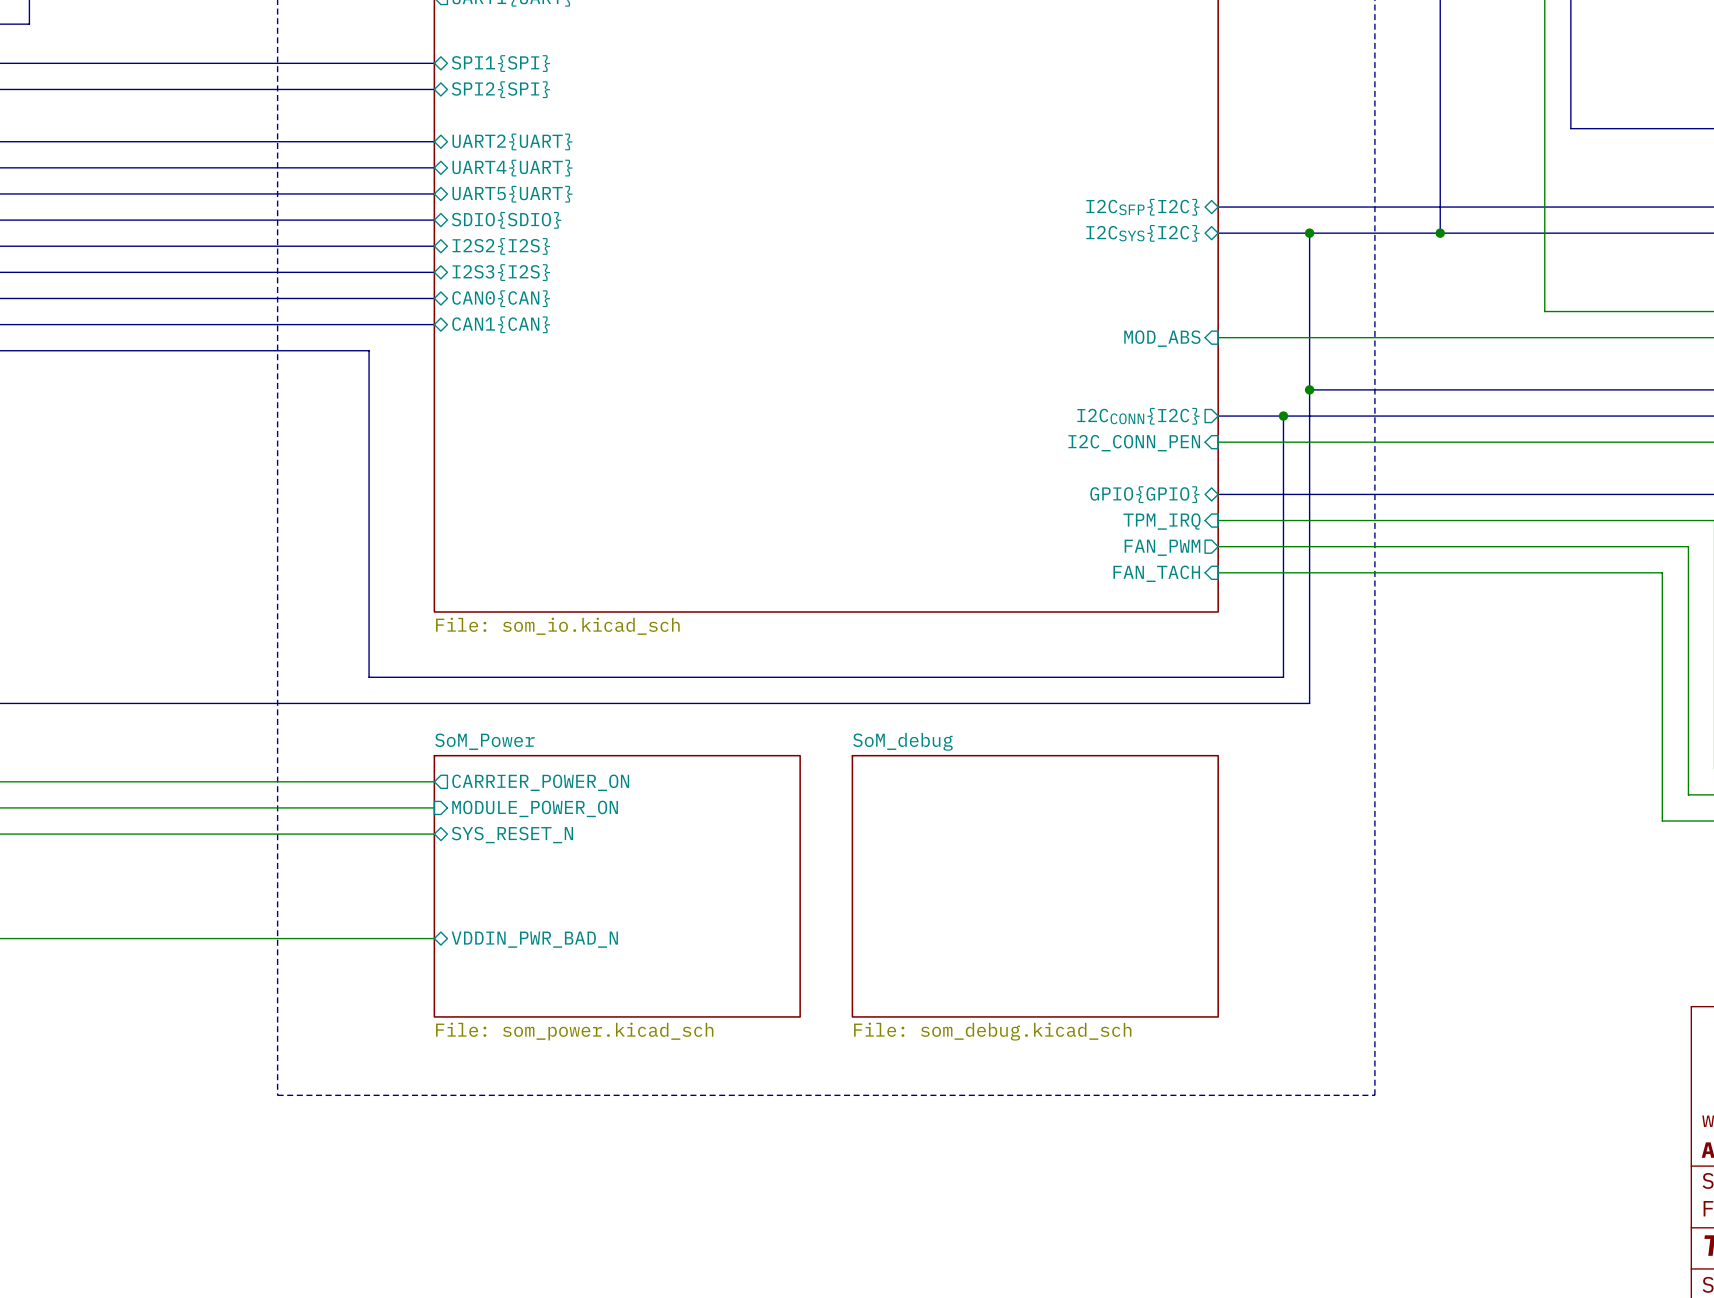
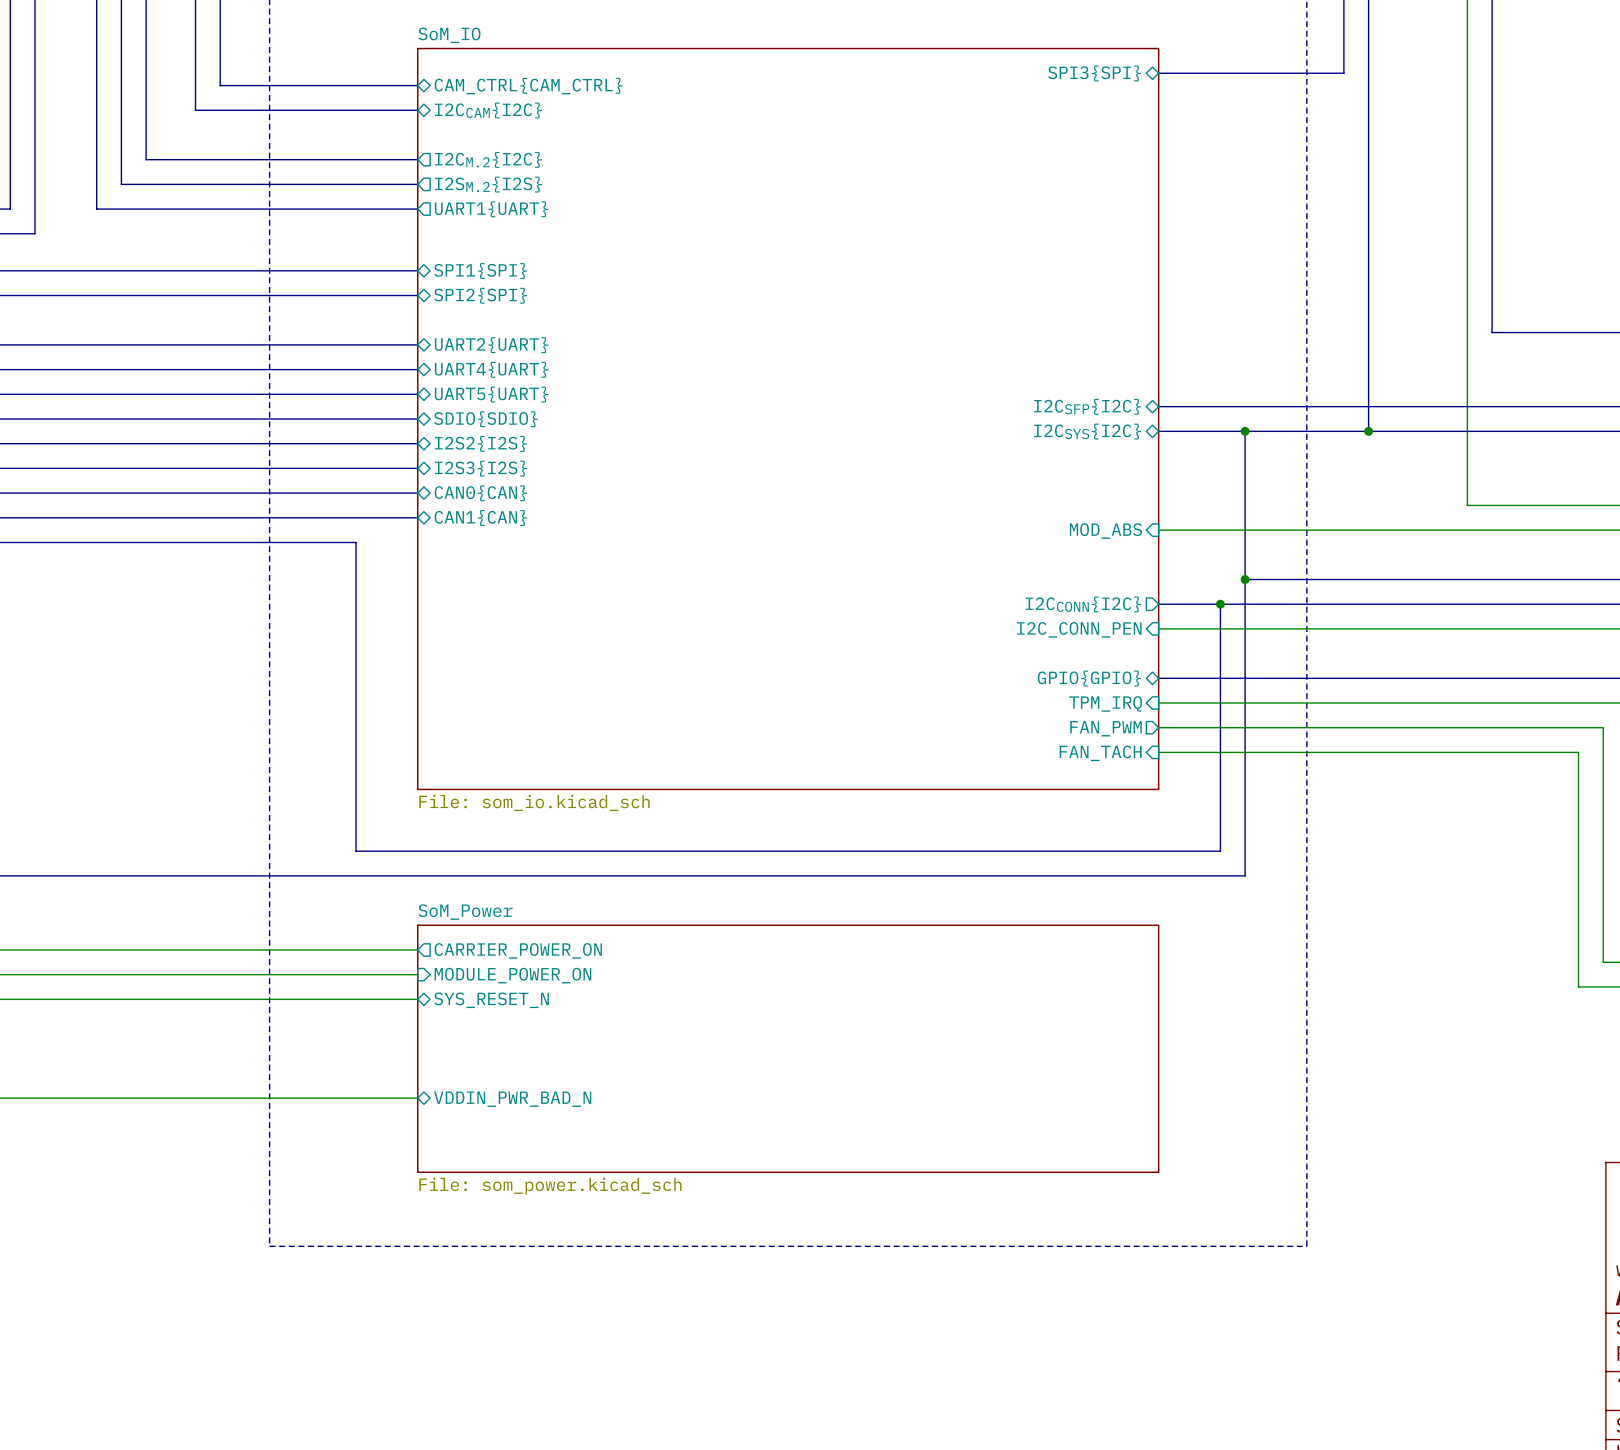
sheet SoM_Power: File: som_power.kicad_sch (617, 886) -> none
sheet SoM_Power: none -> File: som_power.kicad_sch (788, 1048)
sheet SoM_debug: File: som_debug.kicad_sch (1035, 886) -> none

